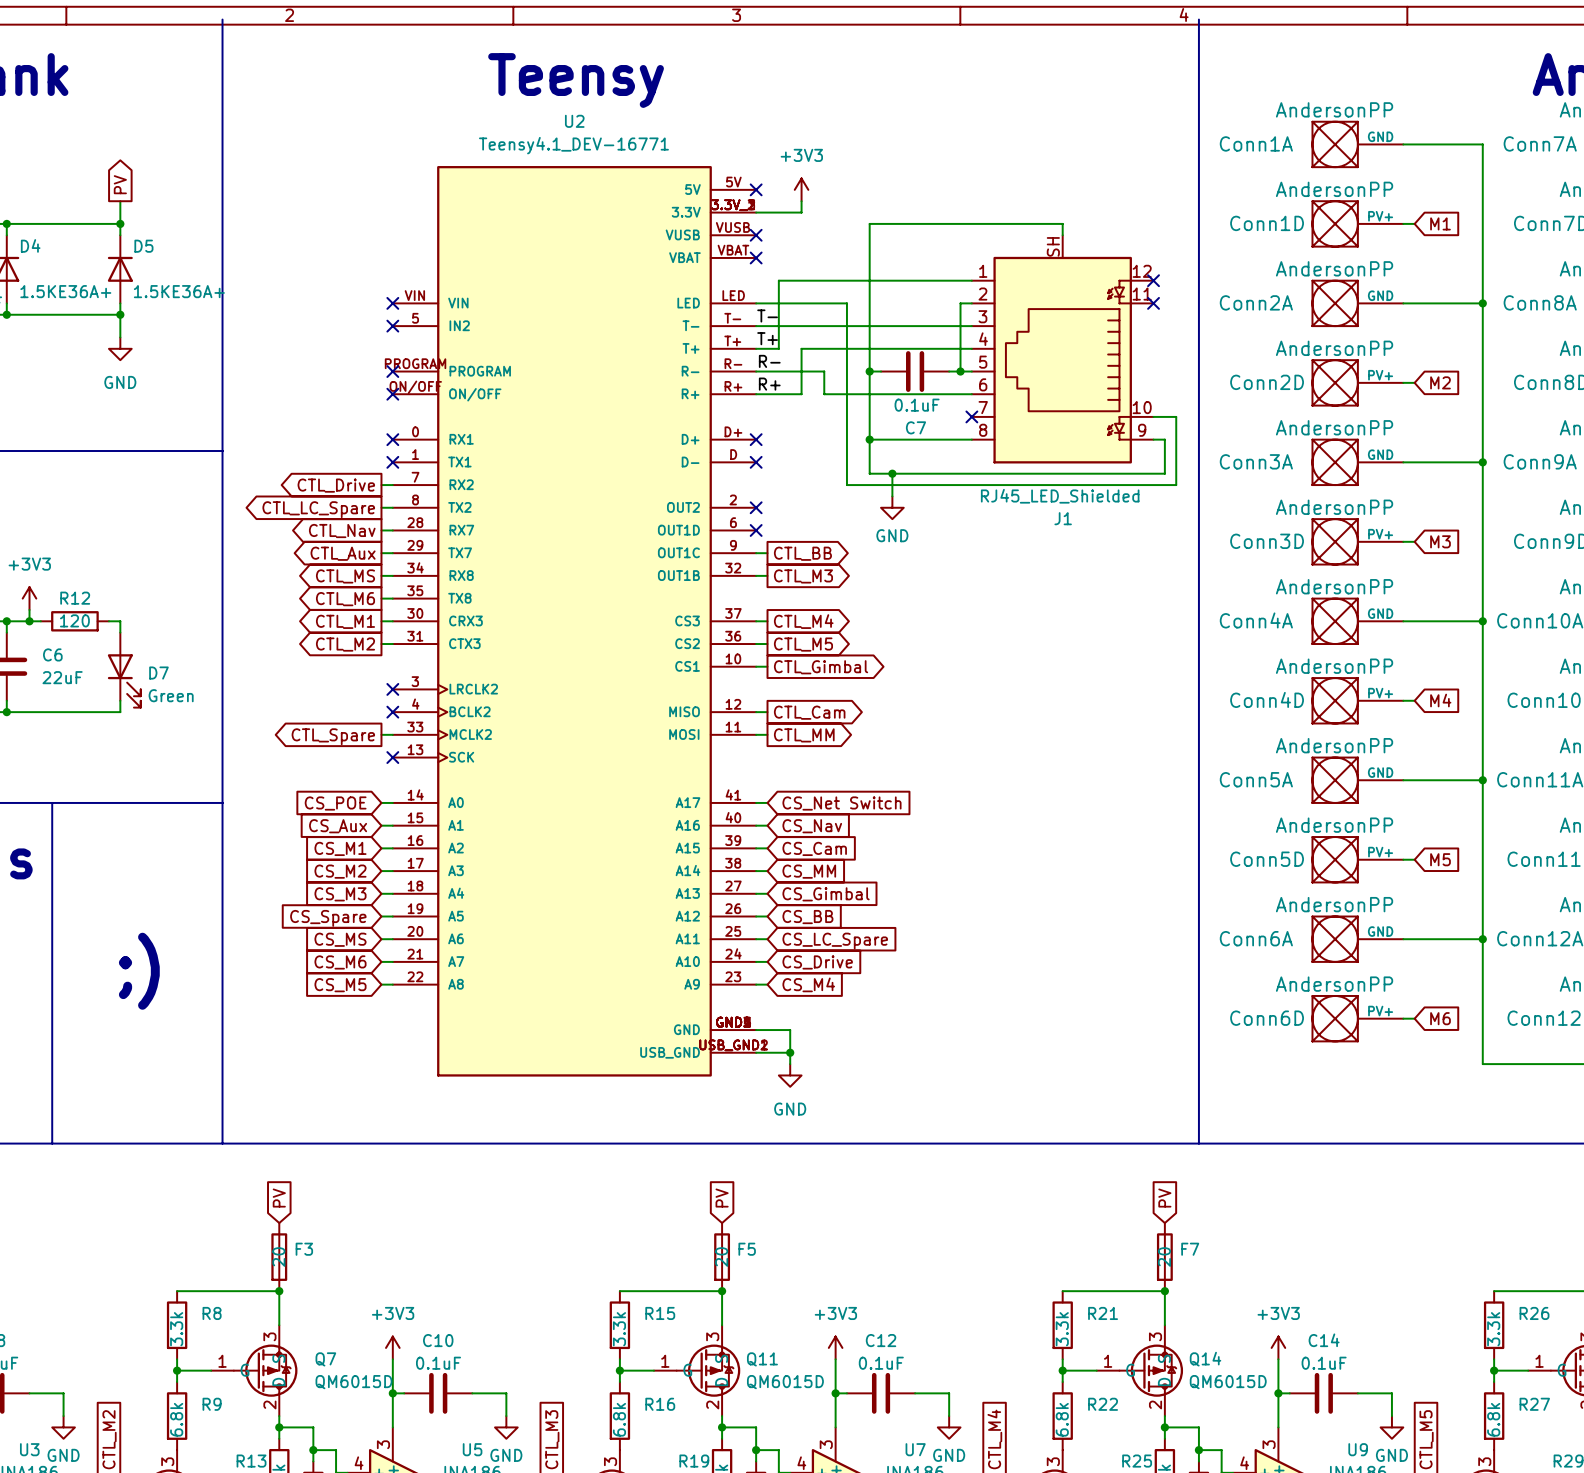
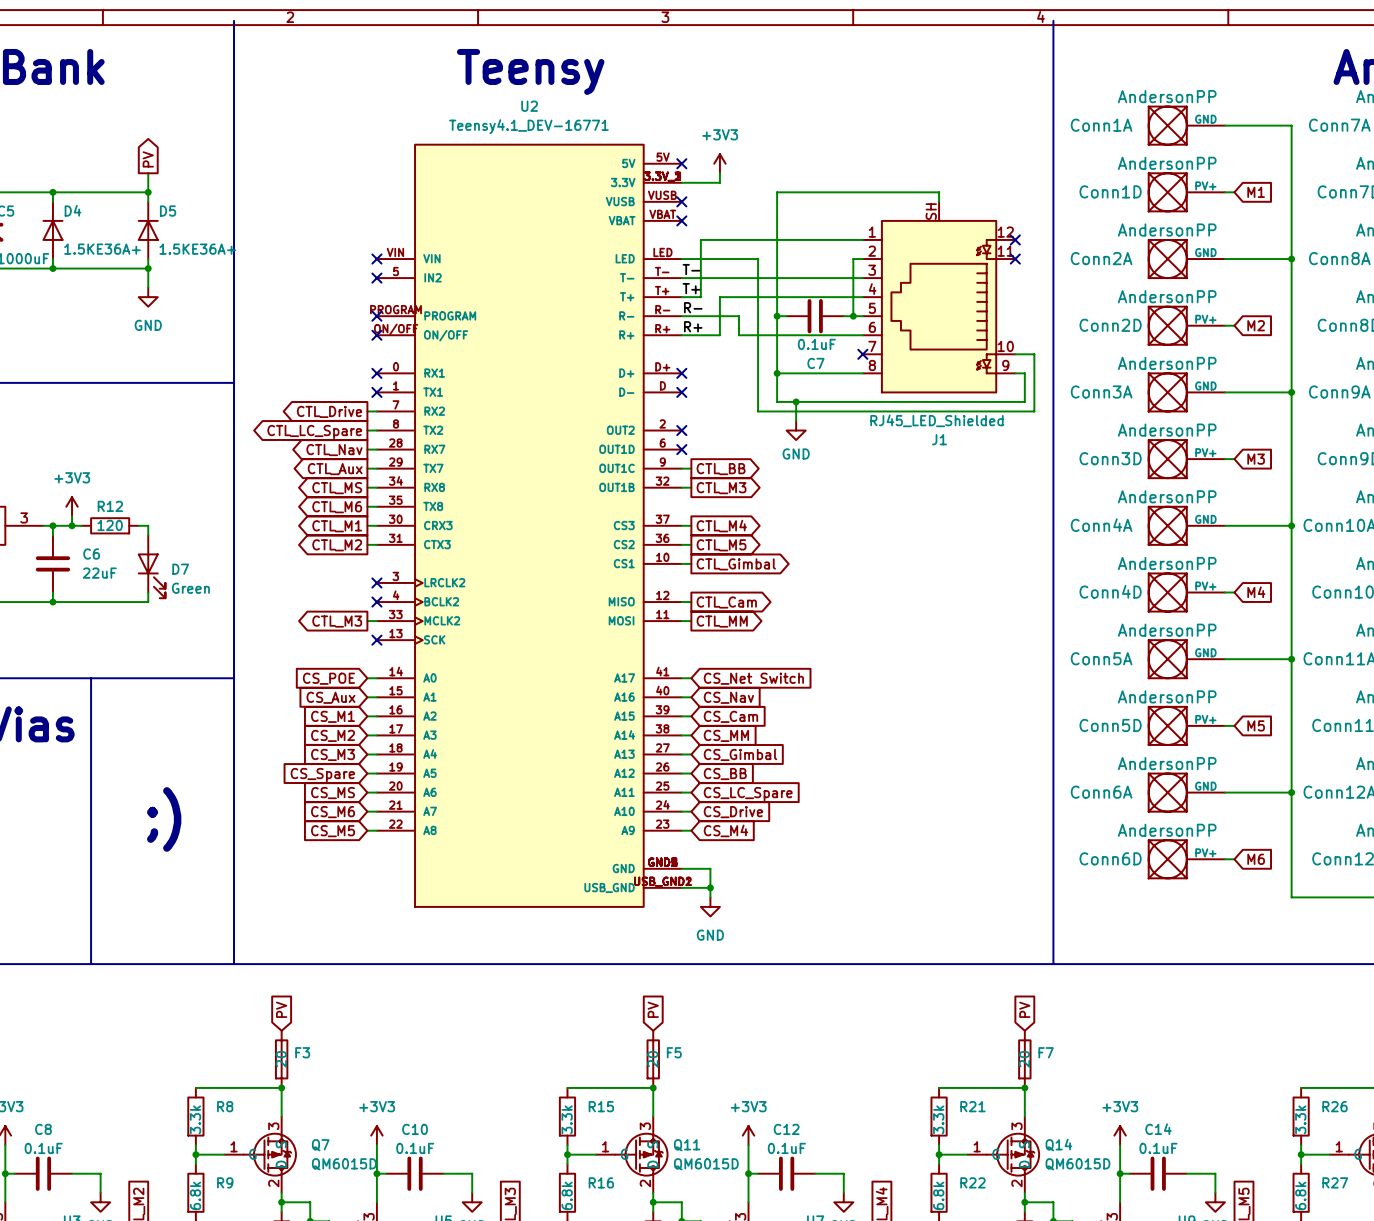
global label: CTL_Spare (333, 736) -> CTL_M3 (337, 621)

